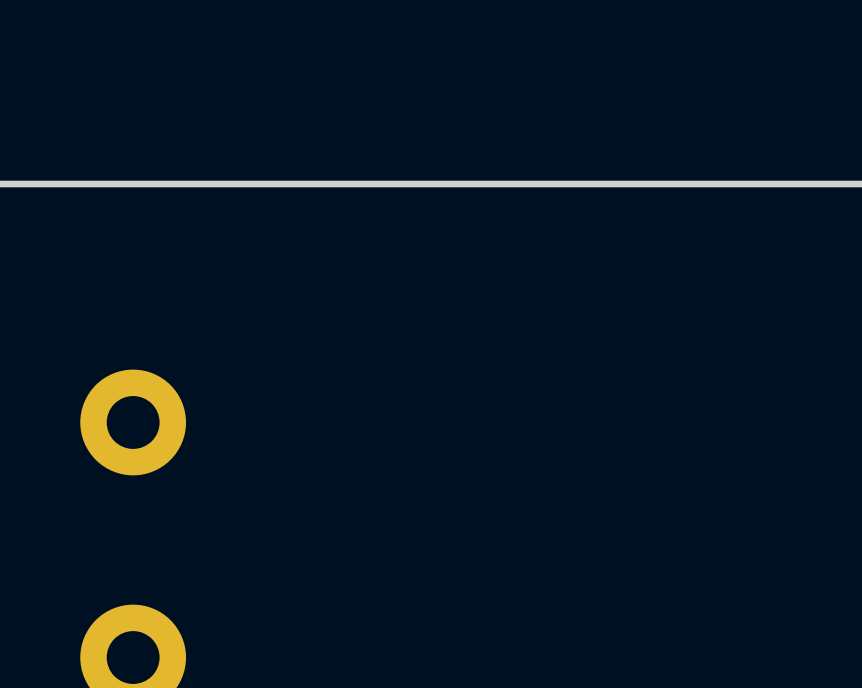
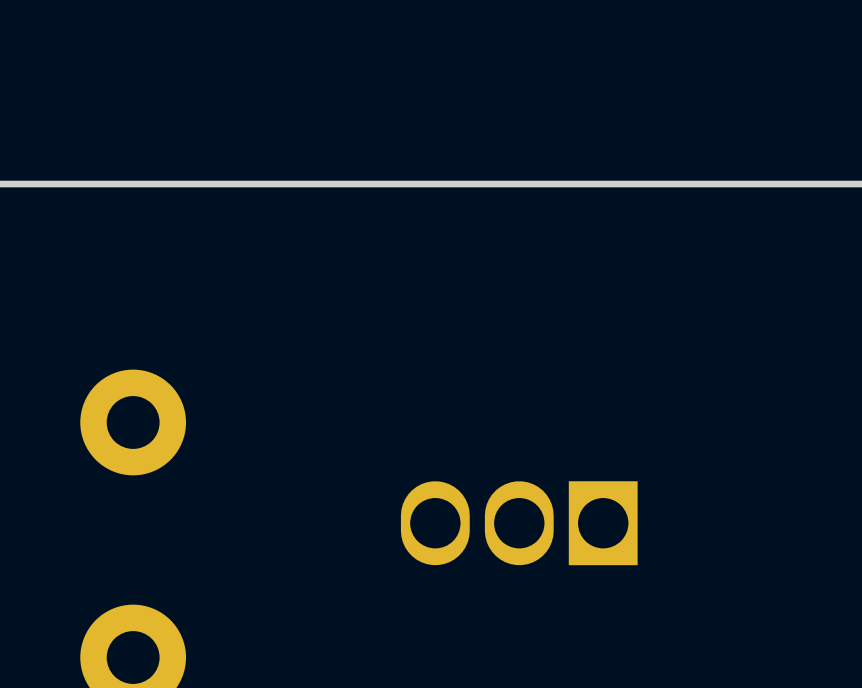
part: none -> (519, 523)

